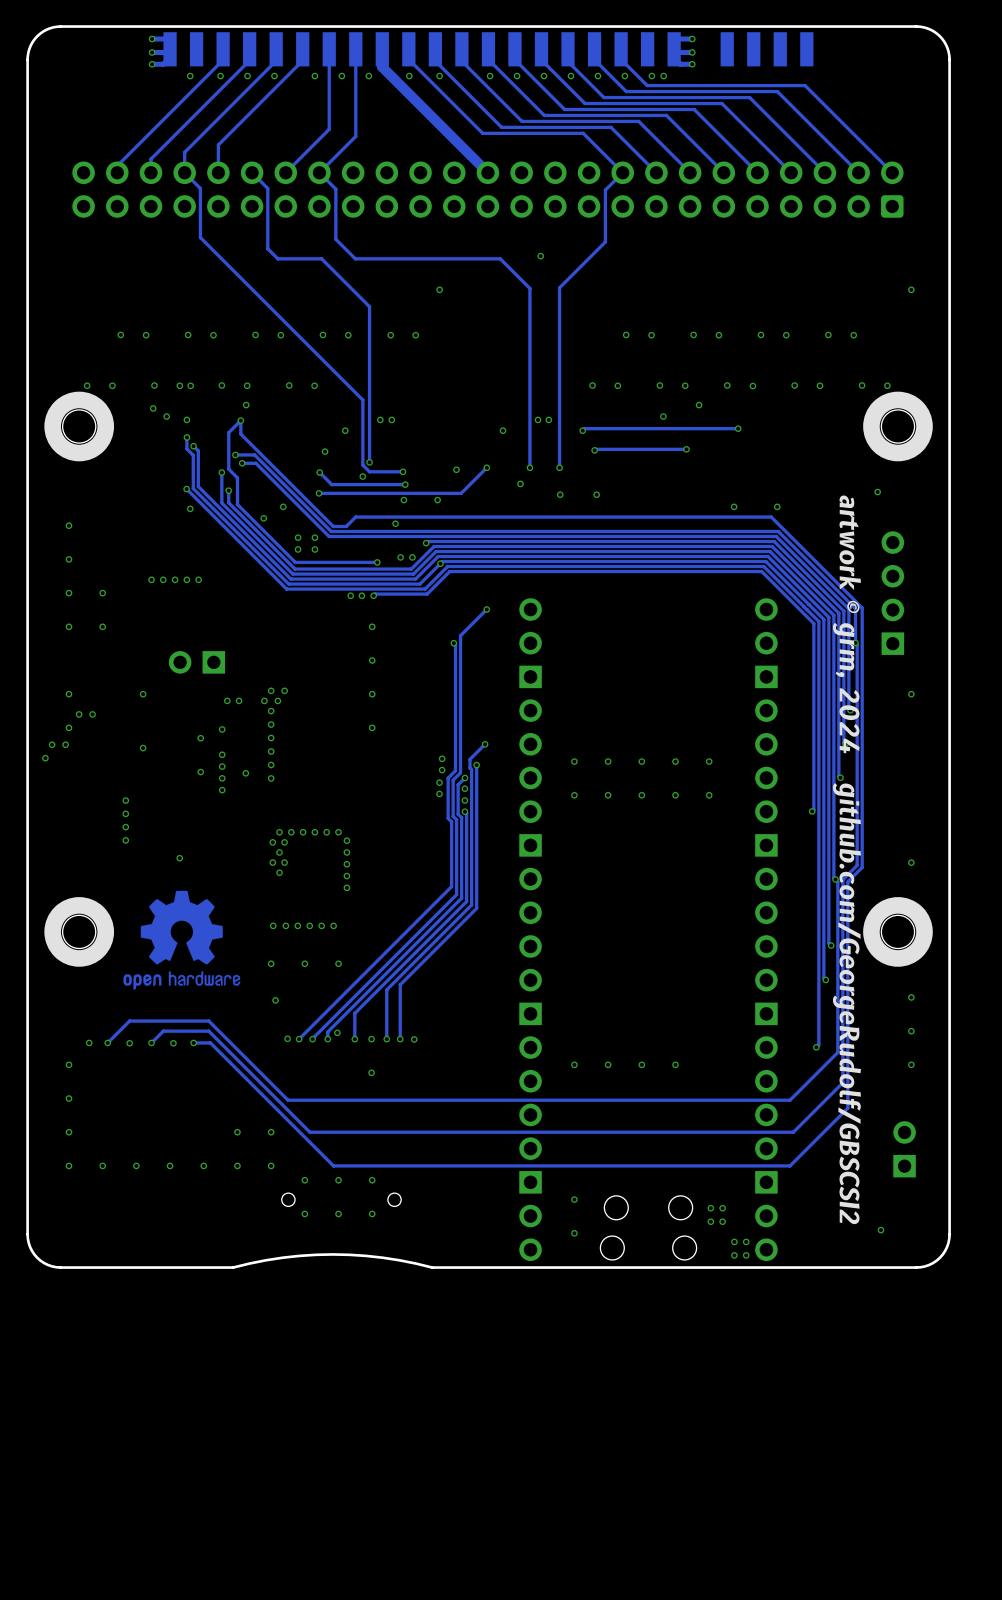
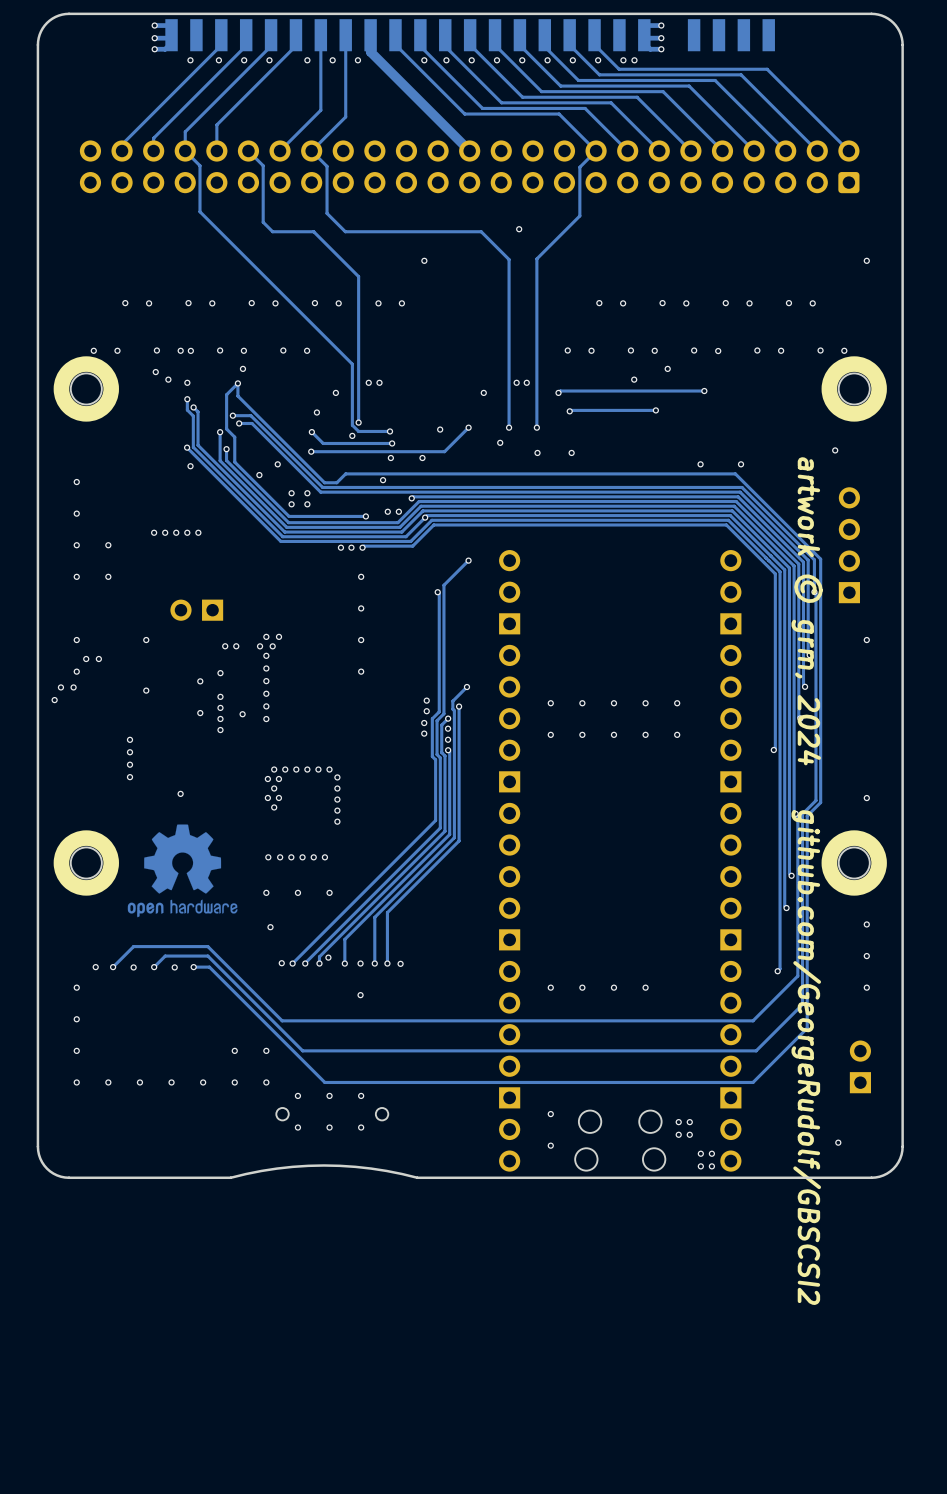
via position: (409, 76) -> (446, 60)

